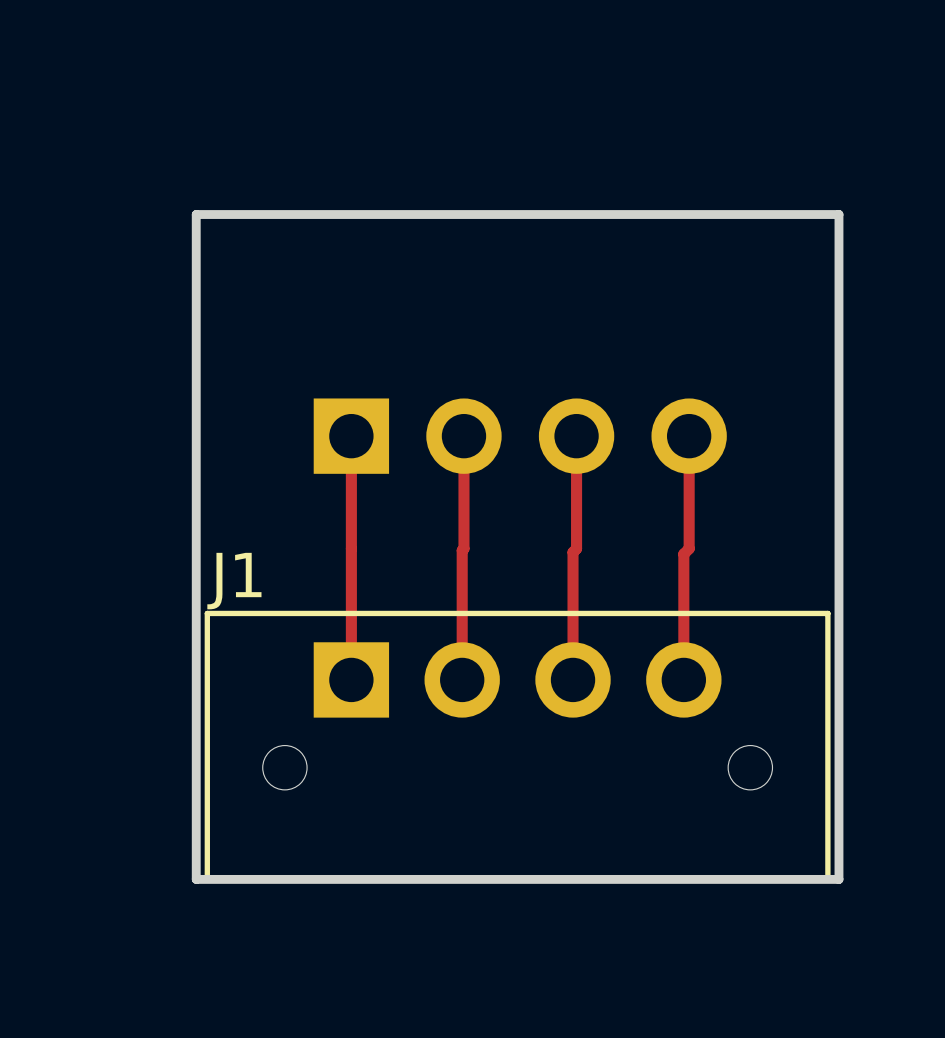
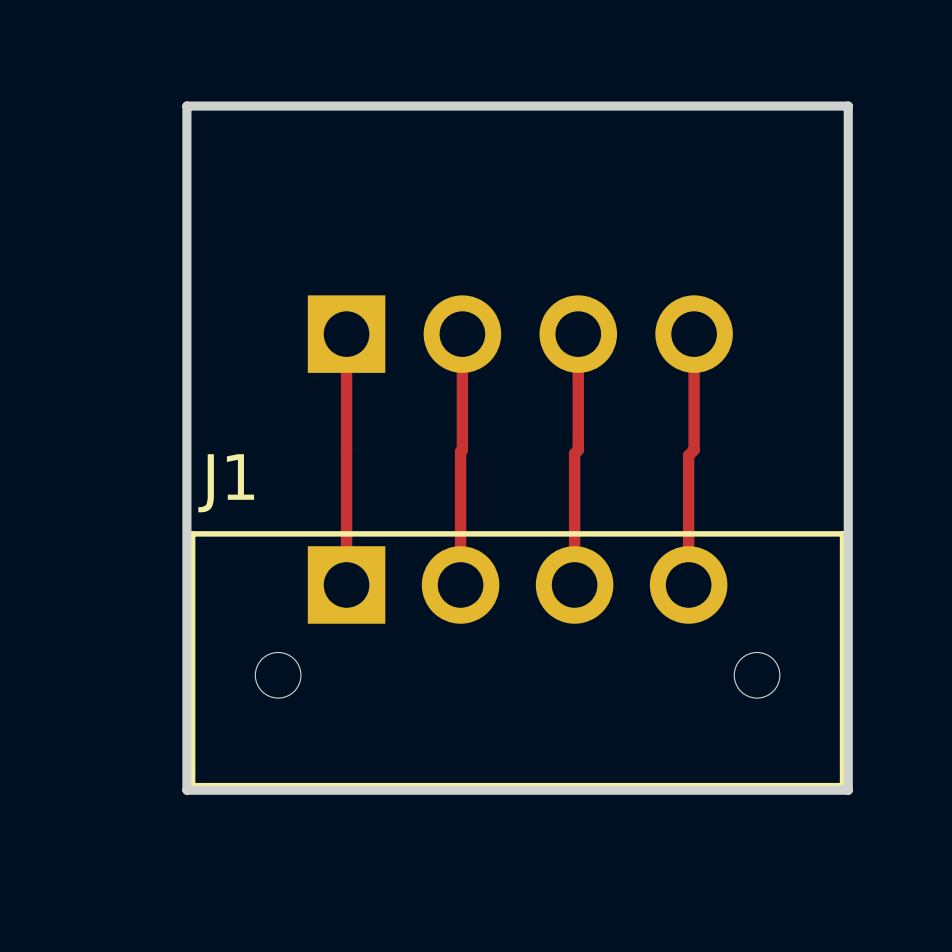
J1 footprint: [204, 610, 831, 883] -> [189, 531, 846, 789]

